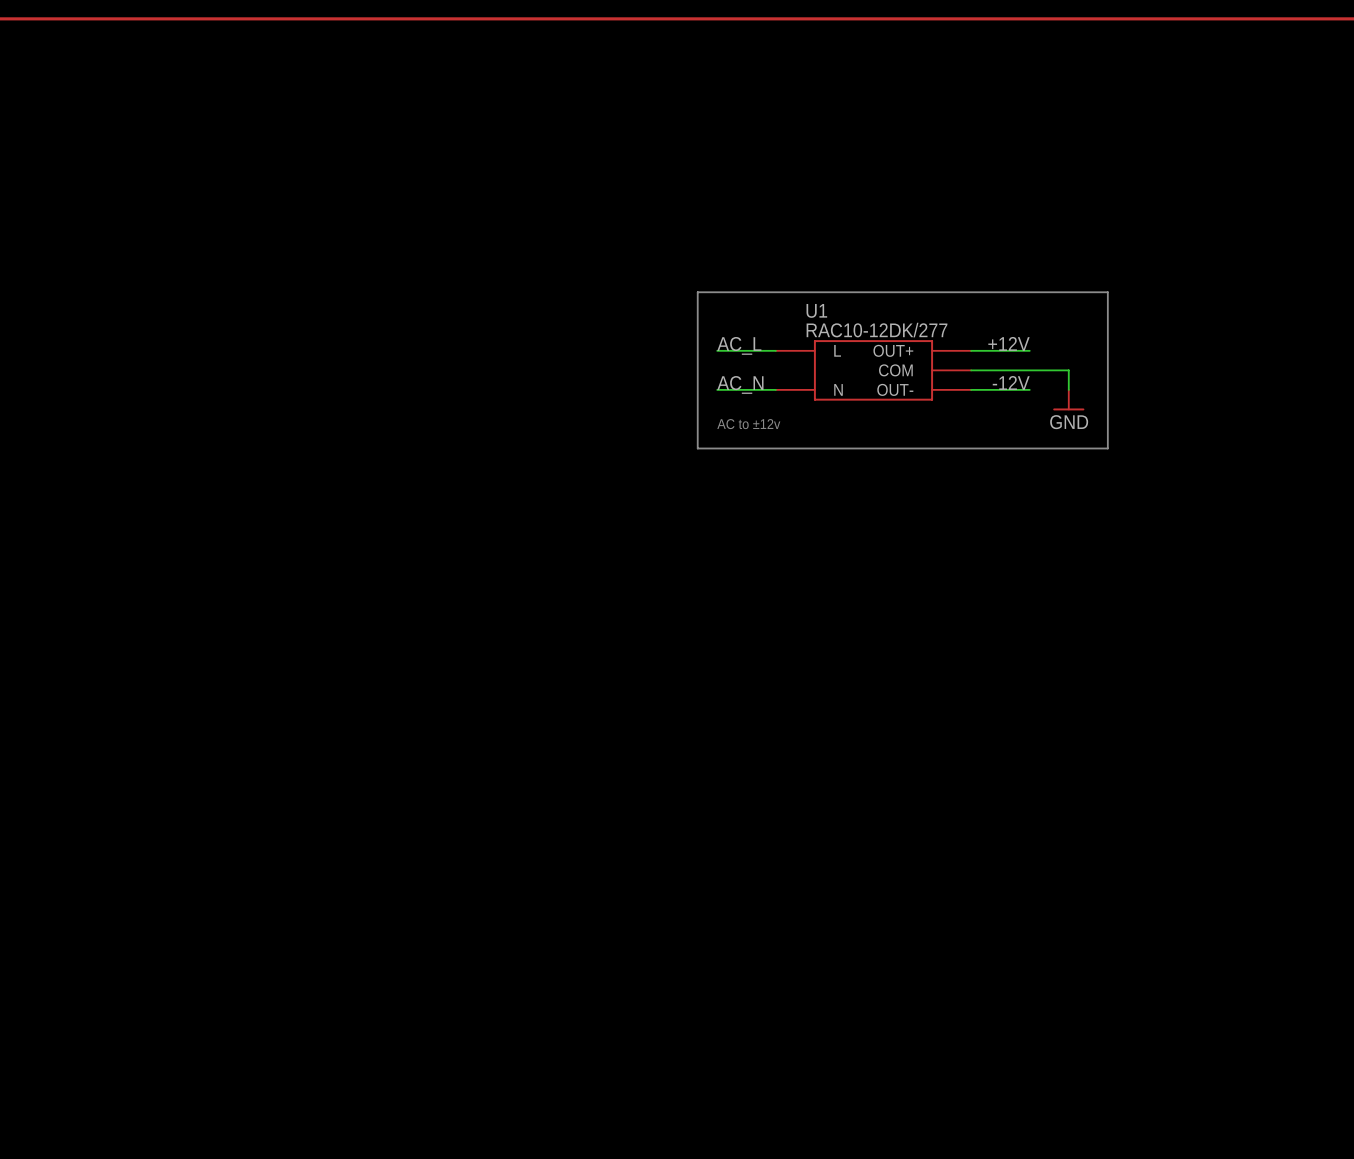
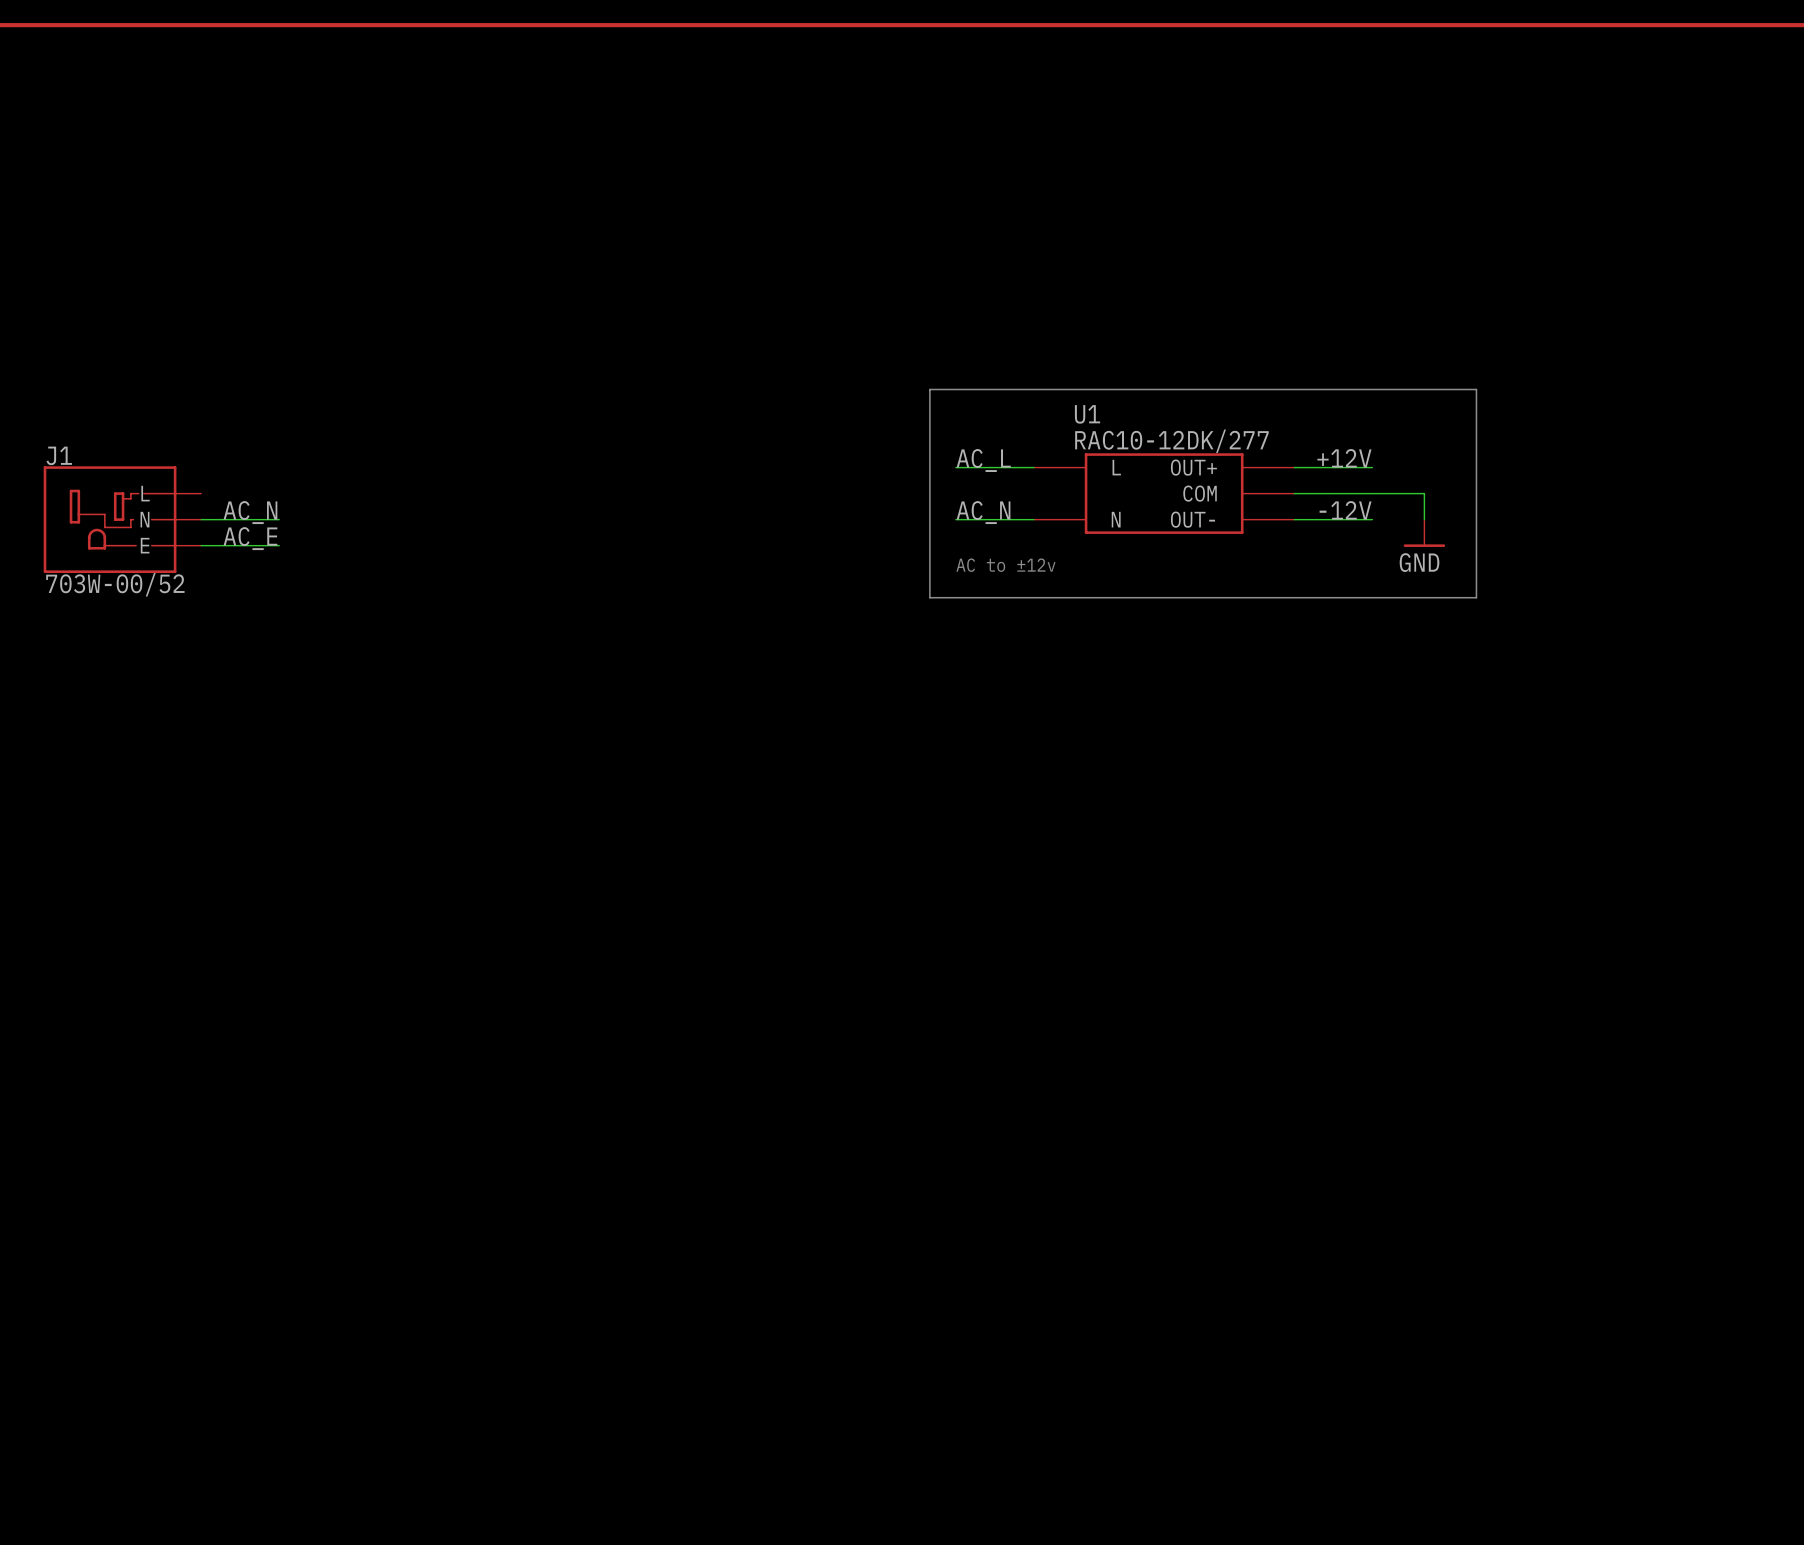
label: none -> AC_N (250, 512)
J1: none -> 703W-00/52 (122, 519)
wire: none -> (201, 519) (279, 519)
label: none -> AC_E (250, 538)
wire: none -> (201, 545) (279, 545)

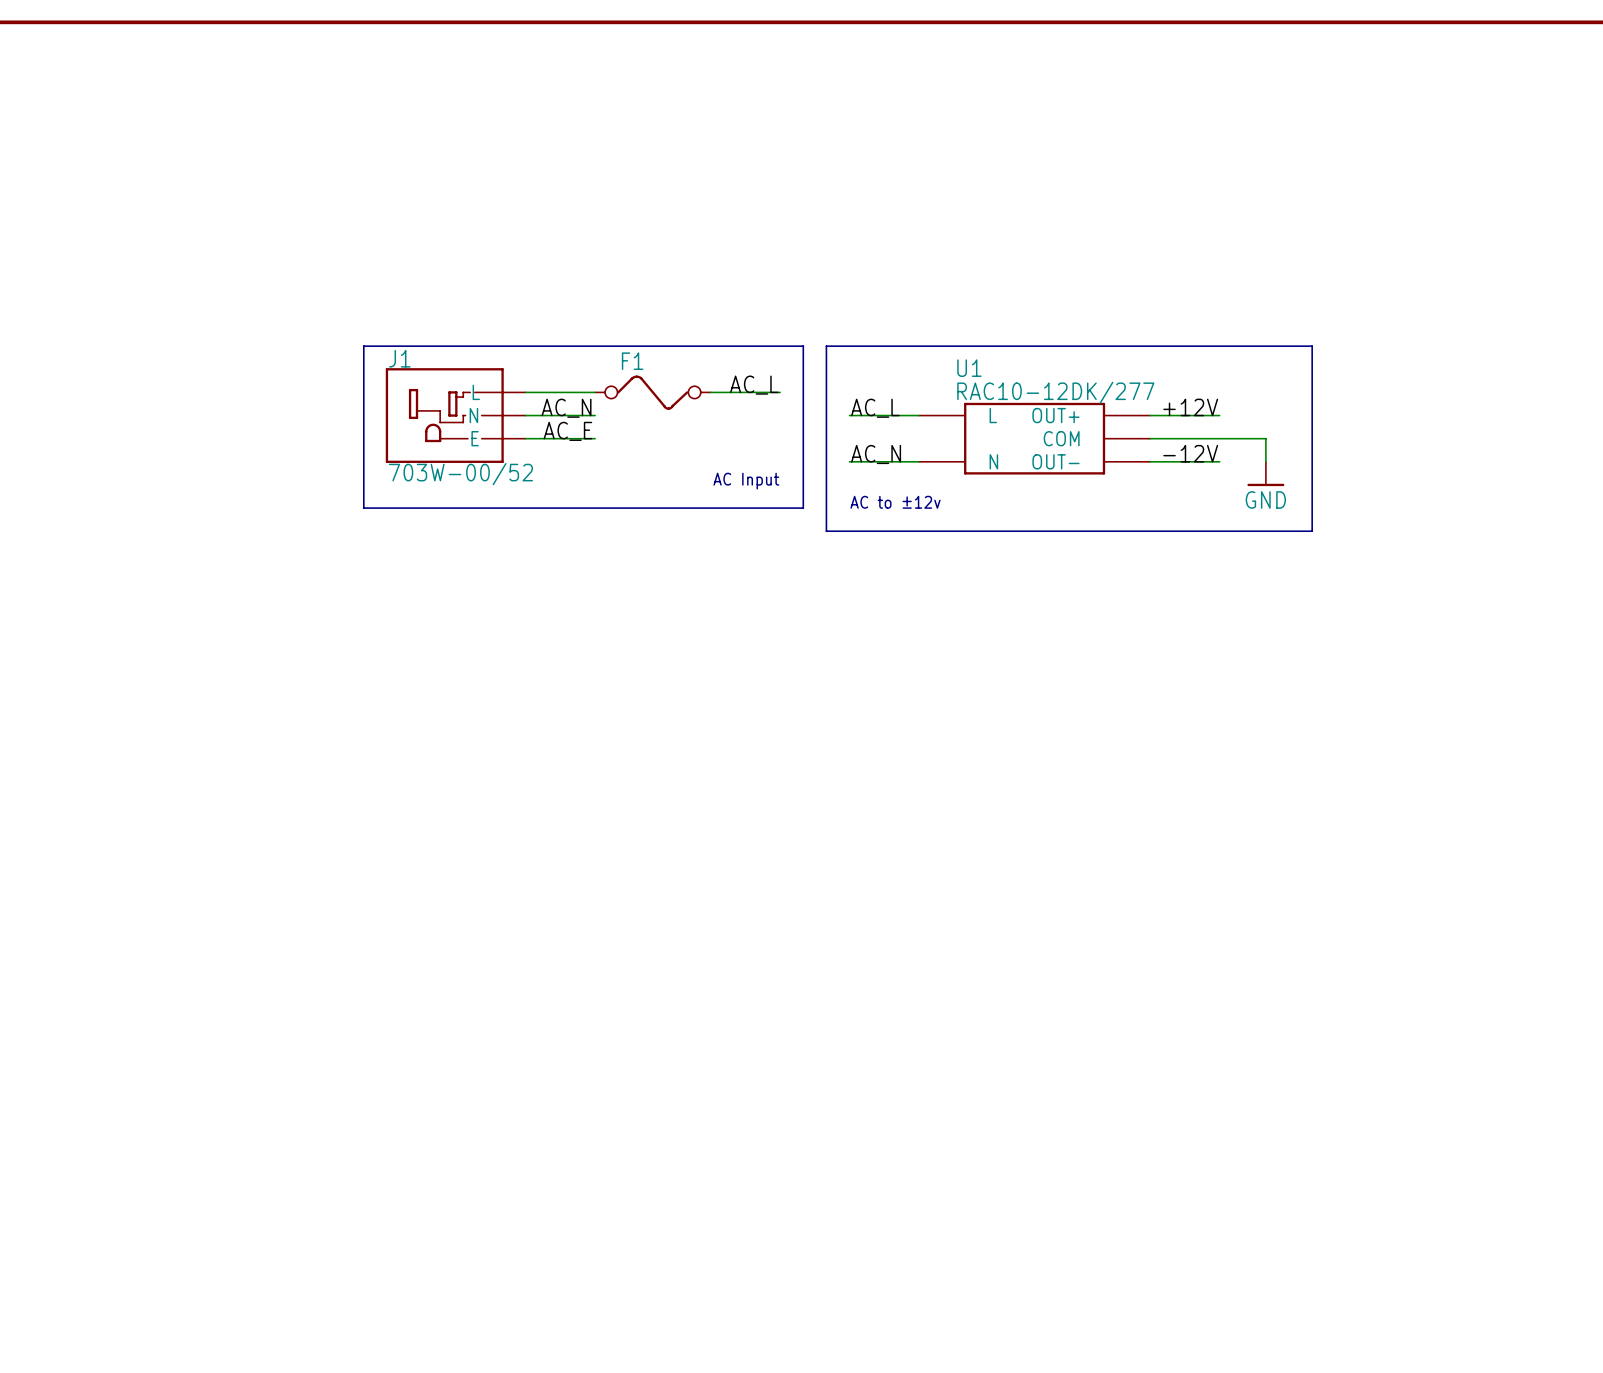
line: none -> (363, 346) (803, 346) (803, 508) (363, 508) (363, 346)
label: none -> AC_L (754, 385)
wire: none -> (525, 392) (595, 392)
F1: none -> (652, 392)
wire: none -> (710, 392) (780, 392)
label: none -> AC_N (566, 408)
wire: none -> (525, 415) (595, 415)
label: none -> AC_E (567, 431)
wire: none -> (525, 438) (595, 438)
label: AC_N (250, 512) -> none
J1 position: (122, 519) -> (455, 415)
wire: (201, 519) (279, 519) -> none
label: AC_E (250, 538) -> none
text: none -> AC Input (746, 481)
wire: (201, 545) (279, 545) -> none

